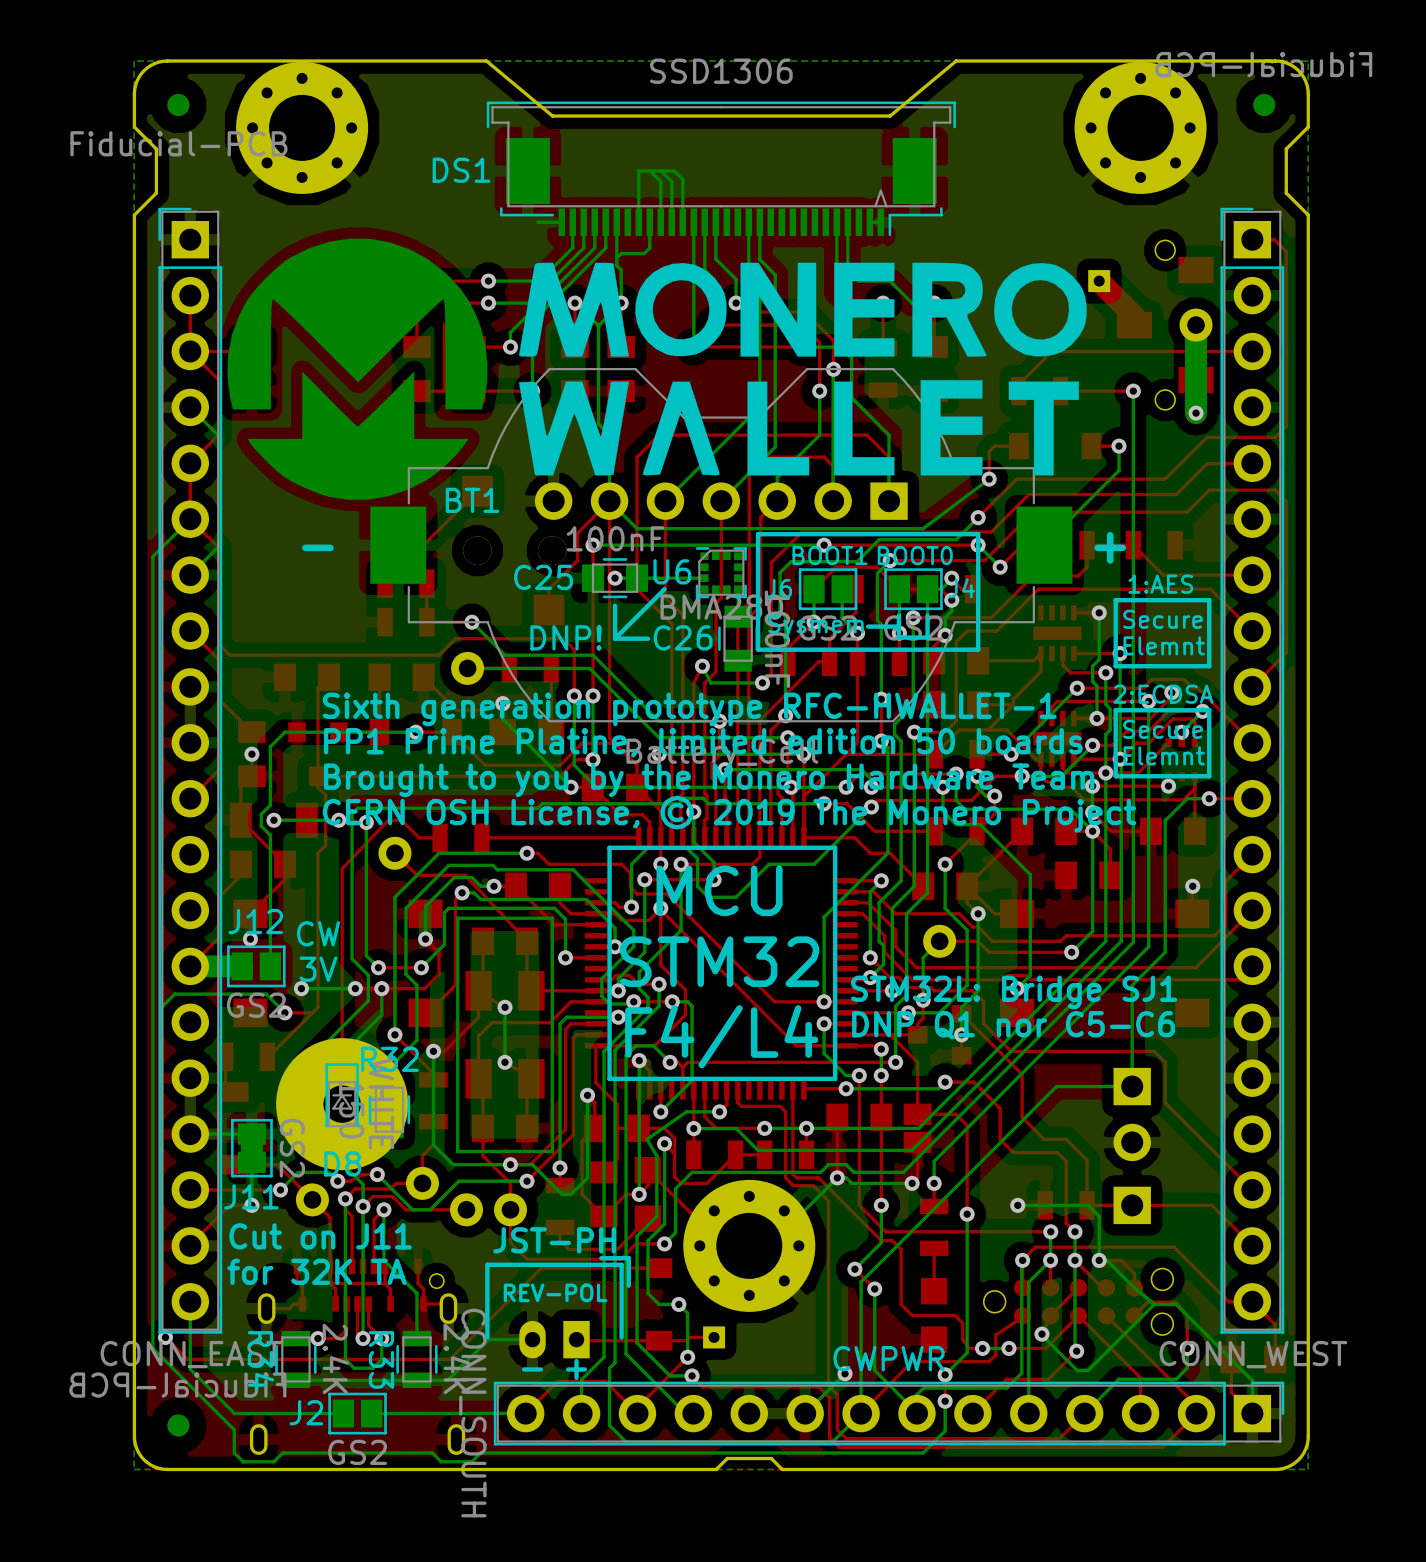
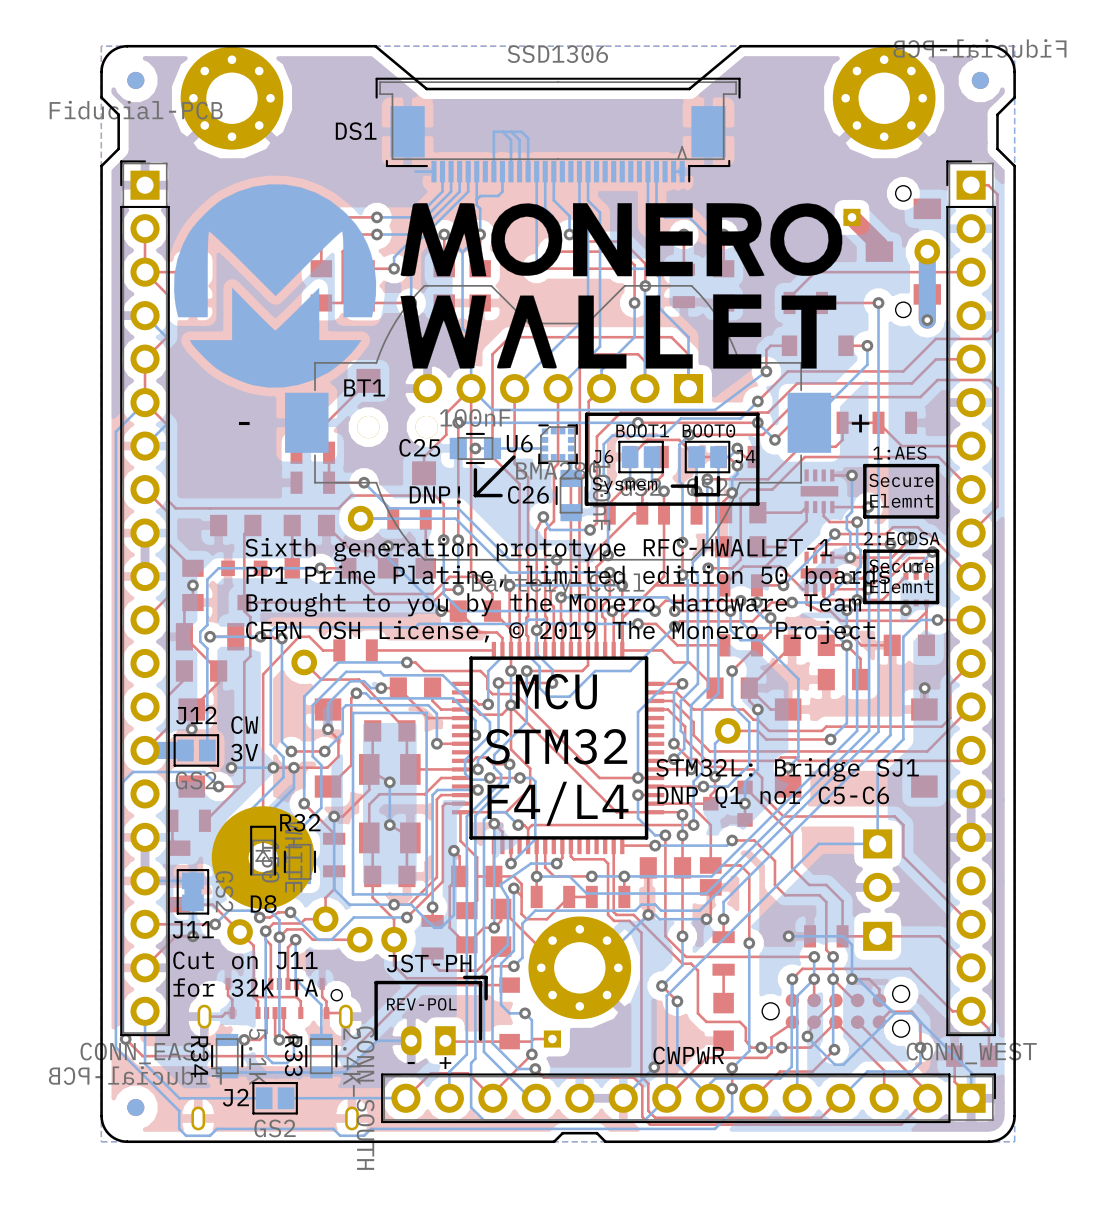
R34 value: 2.4K (335, 1358) -> 5.1K (257, 1056)

